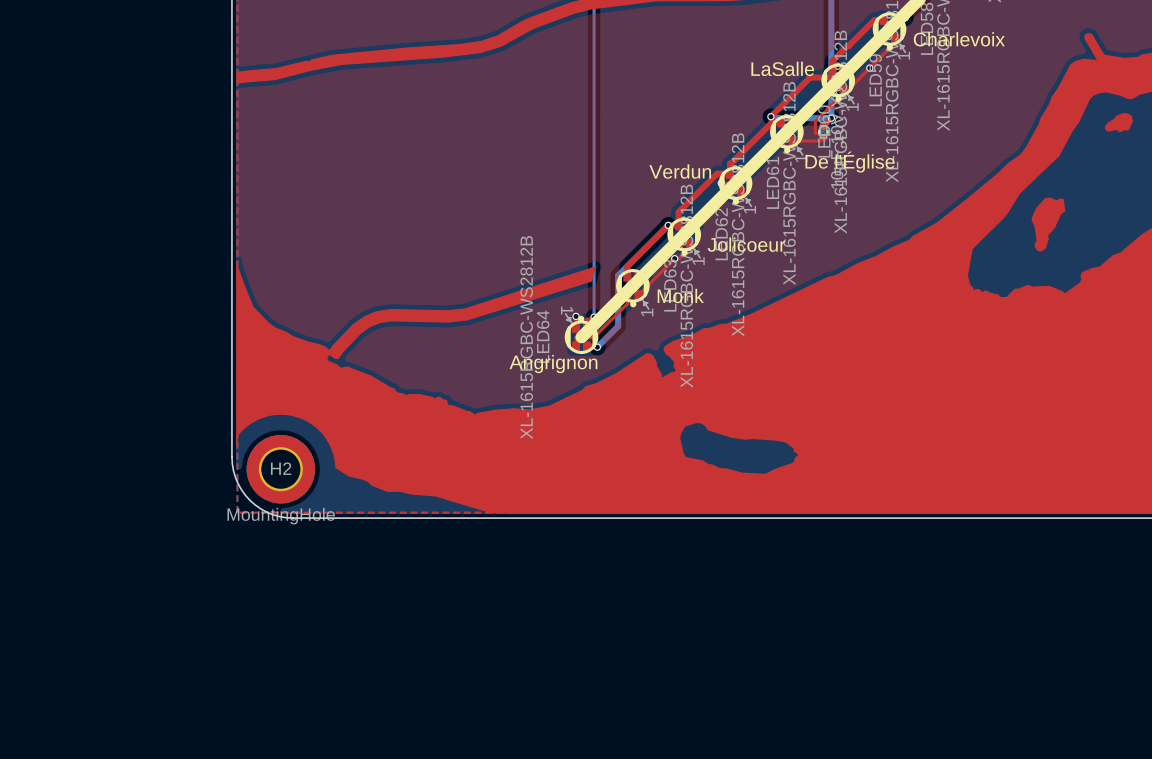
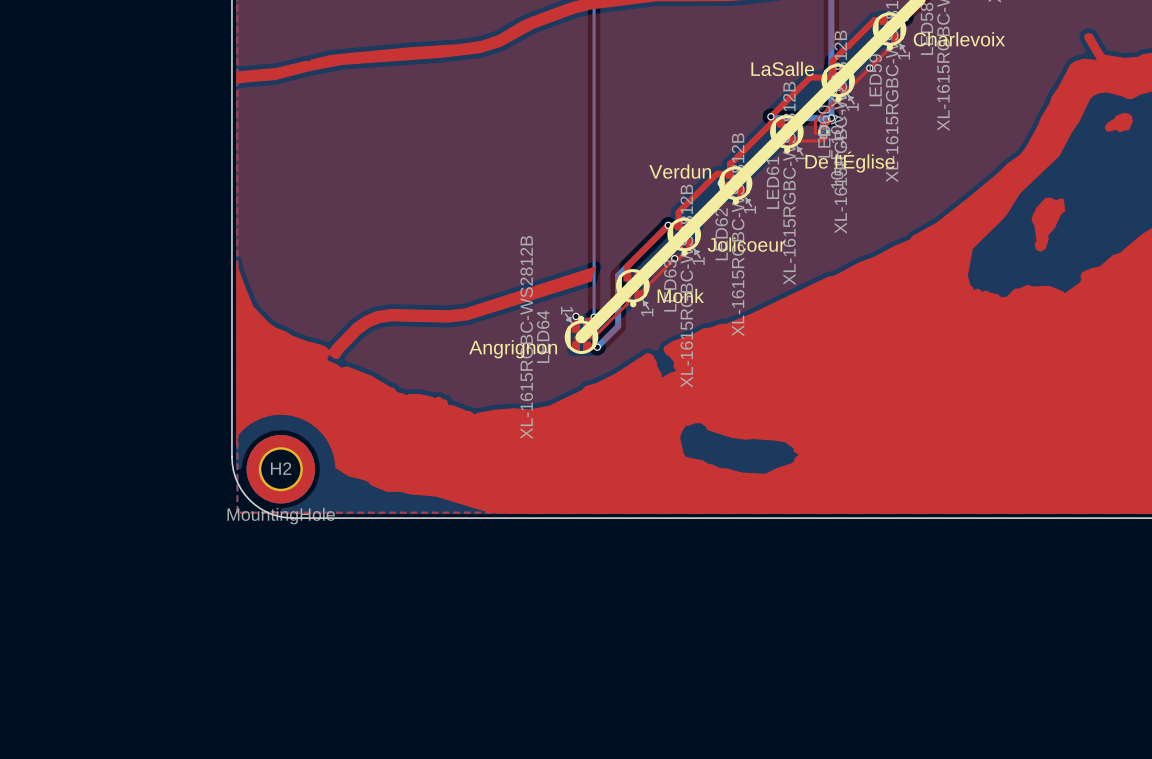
text position: Angrignon (553, 364) -> Angrignon (513, 349)

